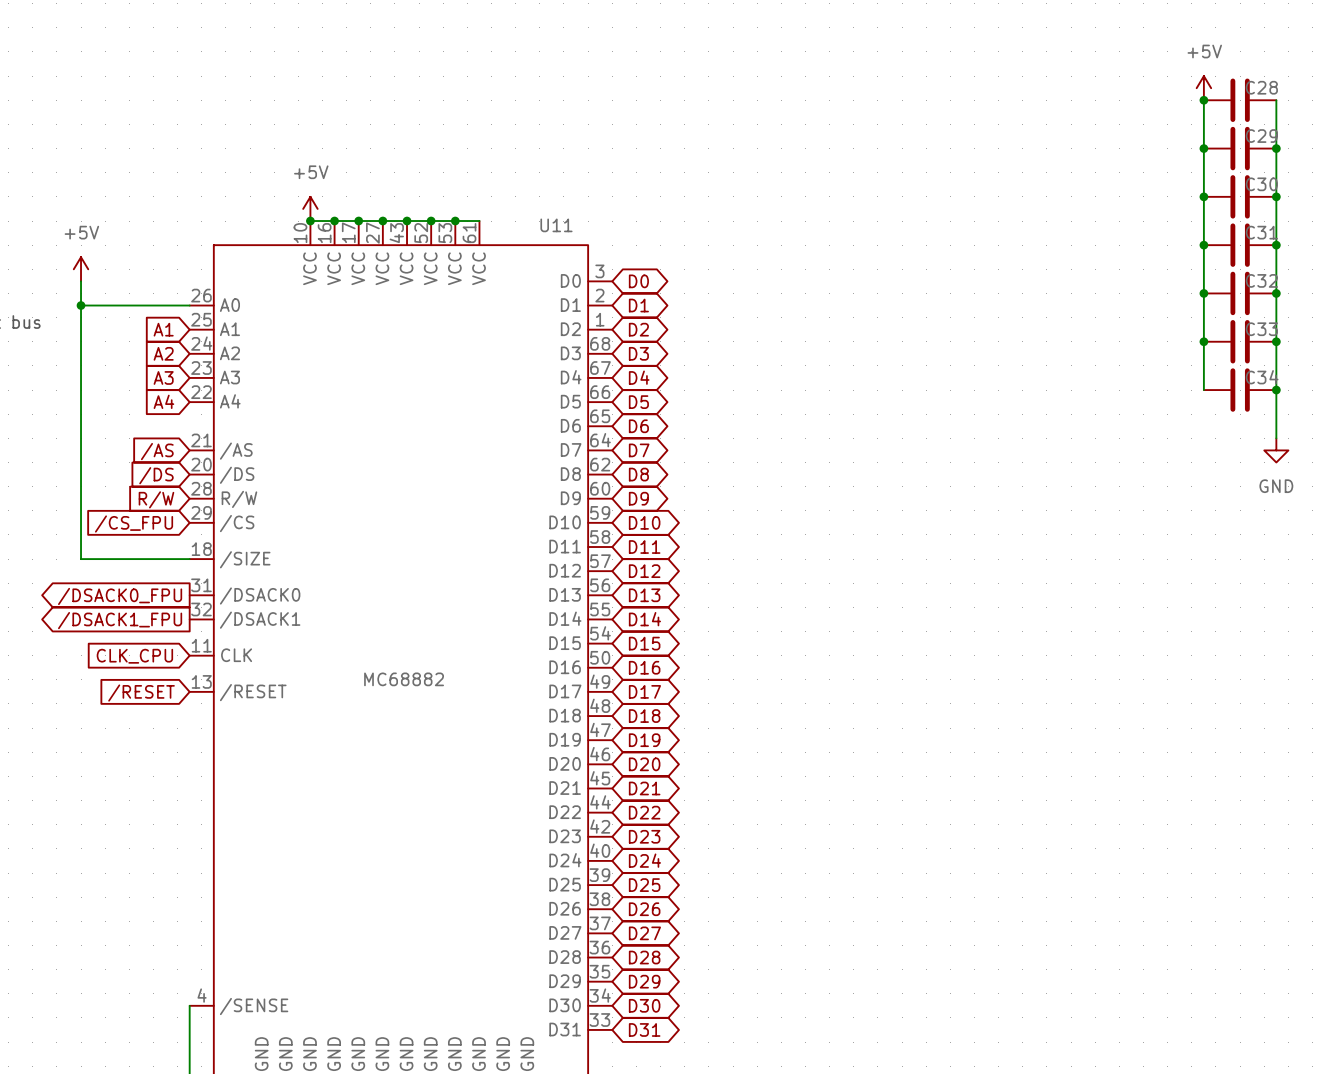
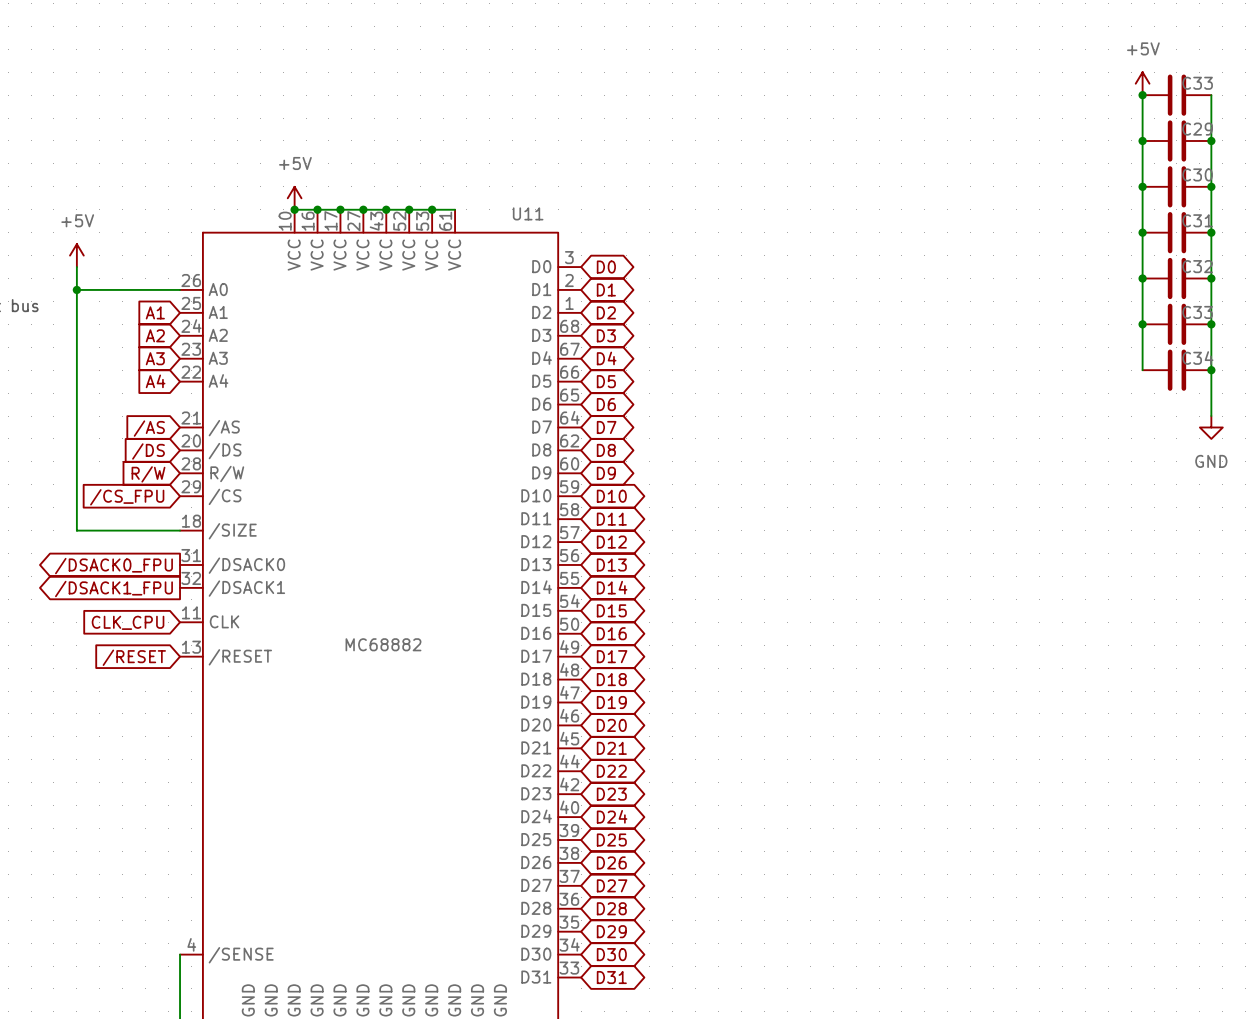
C28 name: C28 (1261, 87) -> C33 (1197, 83)

